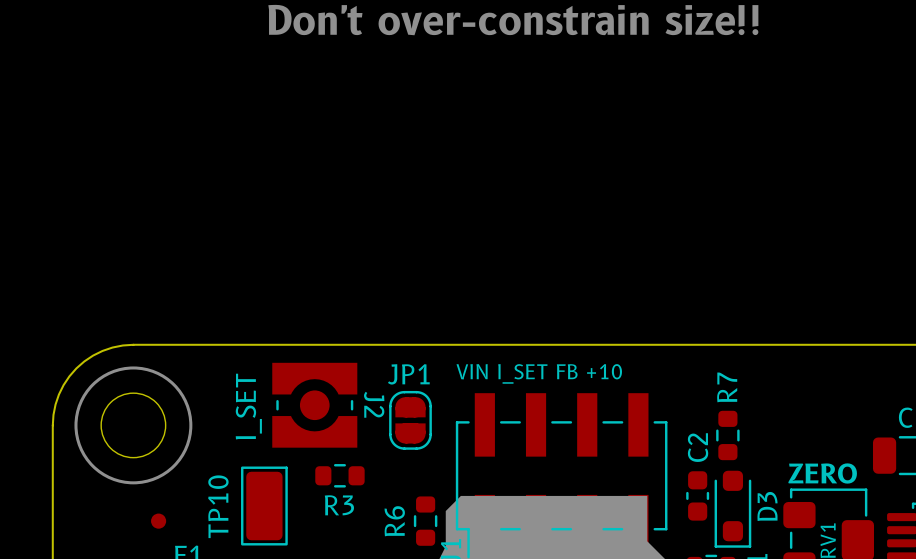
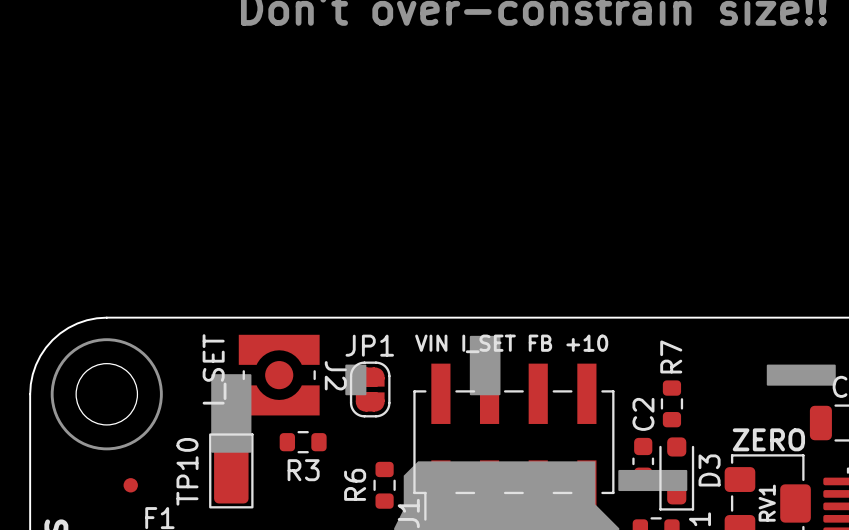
drawing: none -> [469, 335, 501, 396]
drawing: none -> [345, 364, 367, 396]
drawing: none -> [766, 364, 836, 386]
drawing: none -> [211, 374, 252, 453]
drawing: none -> [618, 469, 688, 492]

